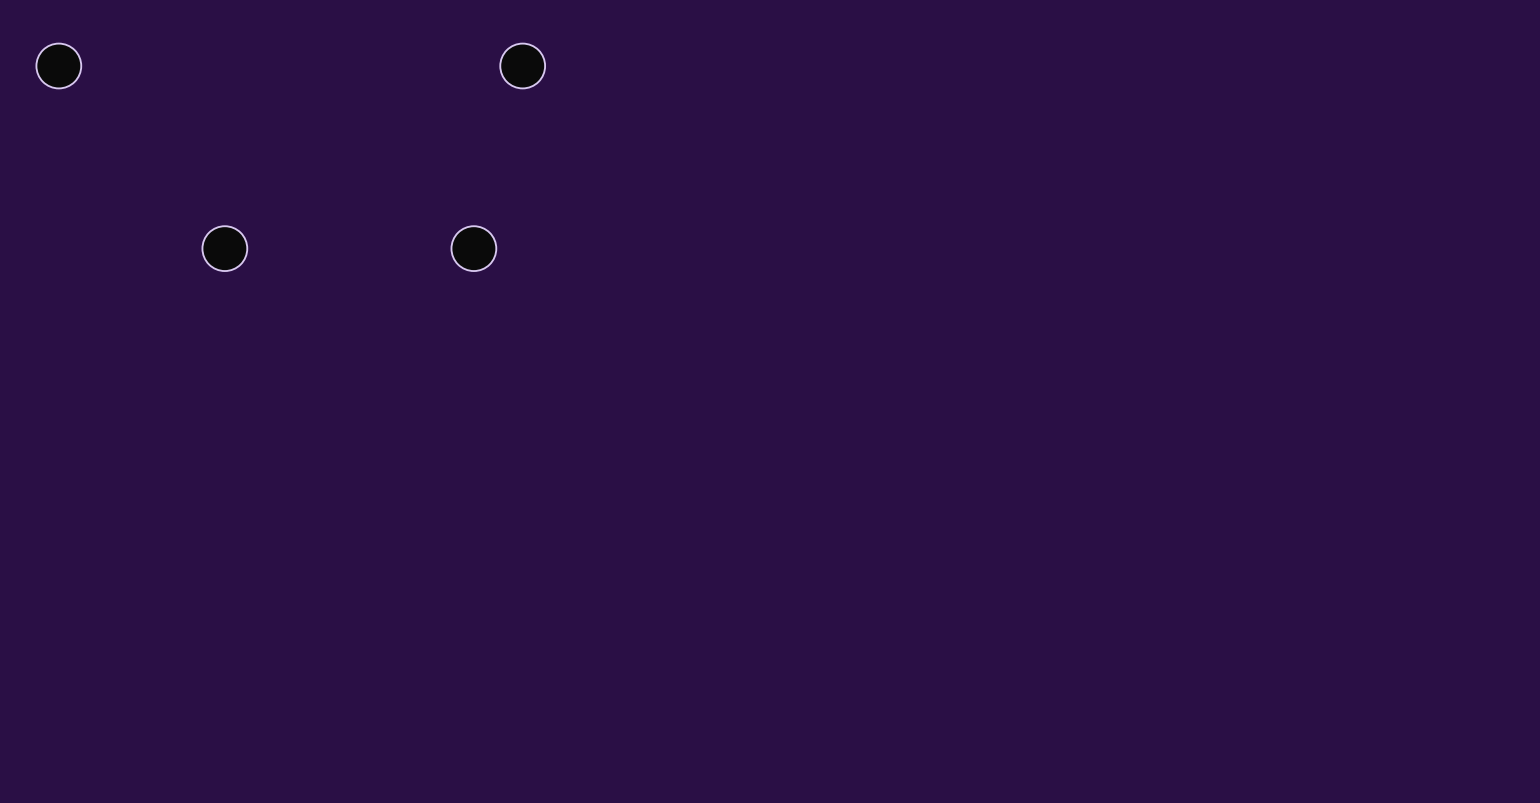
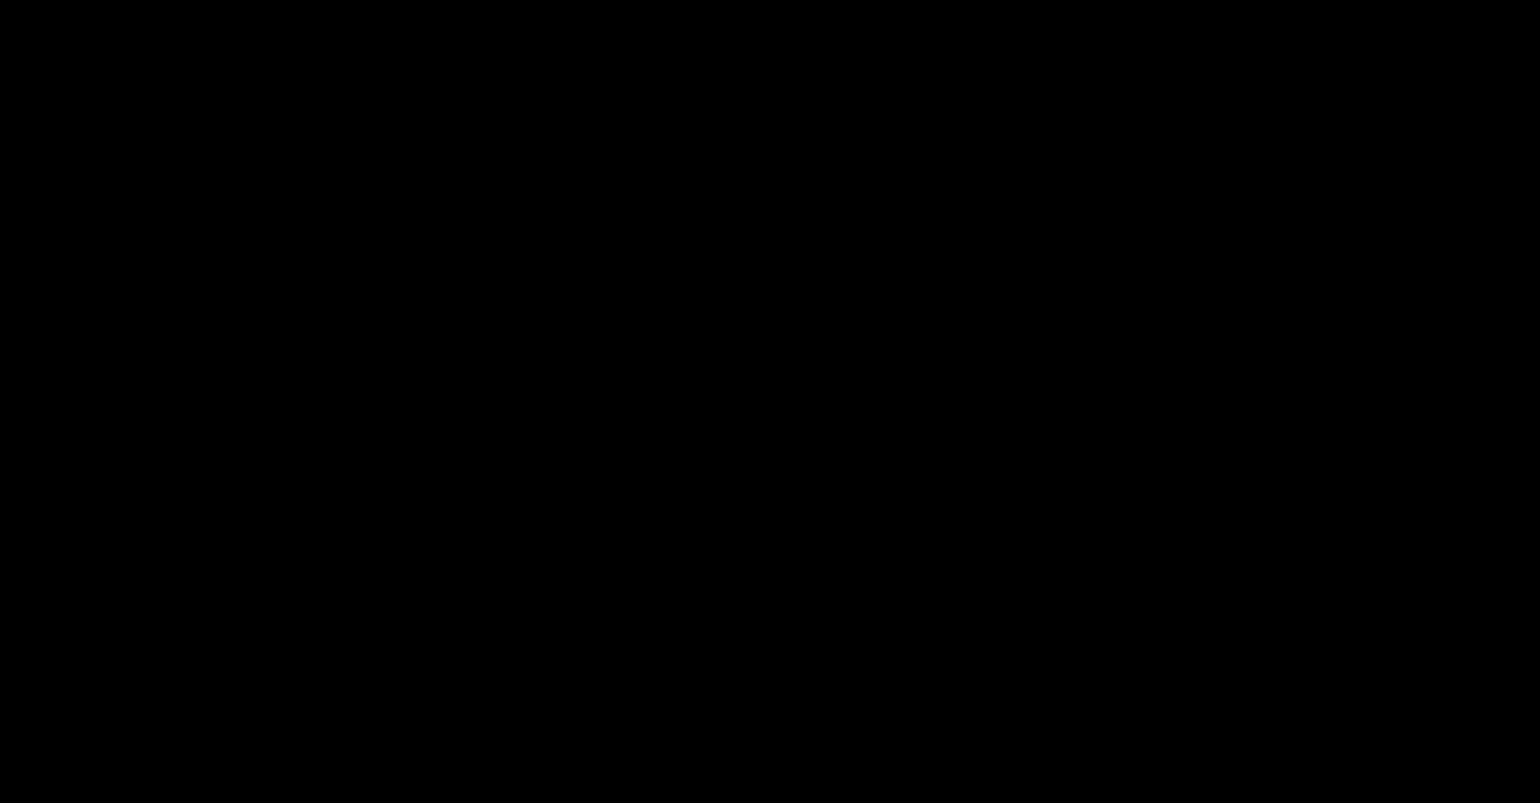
part: (58, 66) -> none
part: (522, 66) -> none
part: (224, 248) -> none
part: (473, 248) -> none

